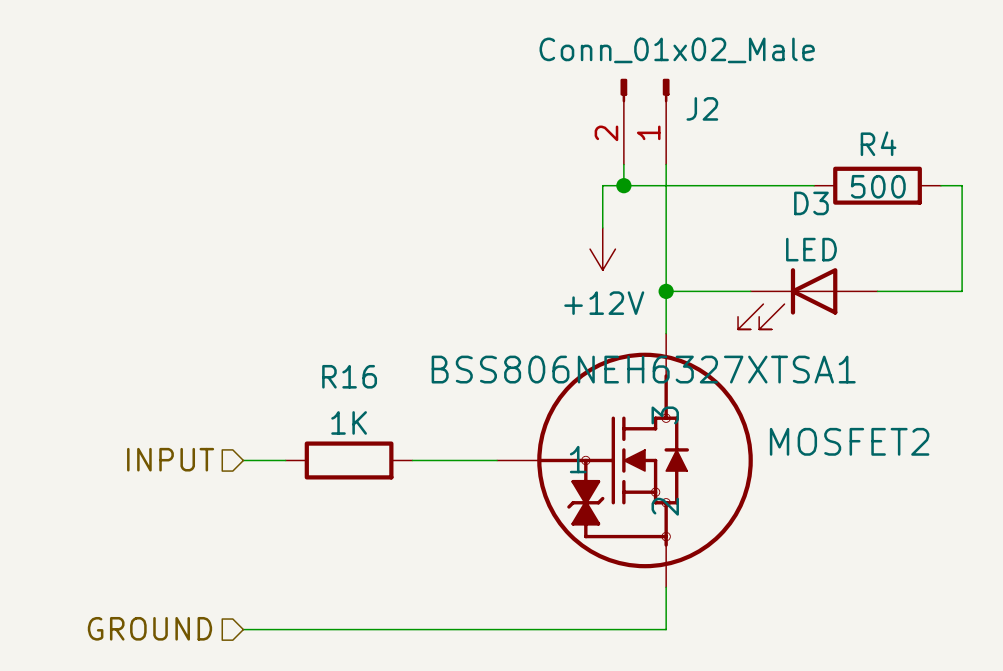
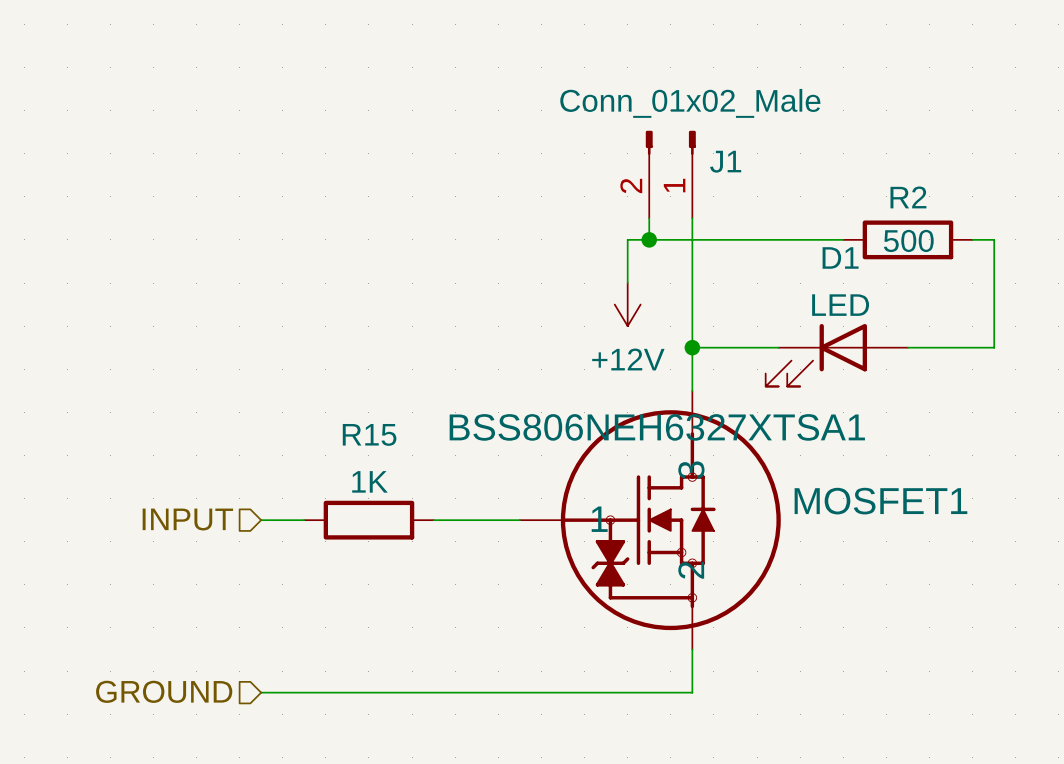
J2 name: J2 (702, 108) -> J1 (725, 161)
R4 name: R4 (878, 143) -> R2 (908, 197)
D3 name: D3 (811, 203) -> D1 (840, 257)
R16 name: R16 (349, 376) -> R15 (369, 434)
MOSFET2 name: MOSFET2 (849, 441) -> MOSFET1 (880, 501)

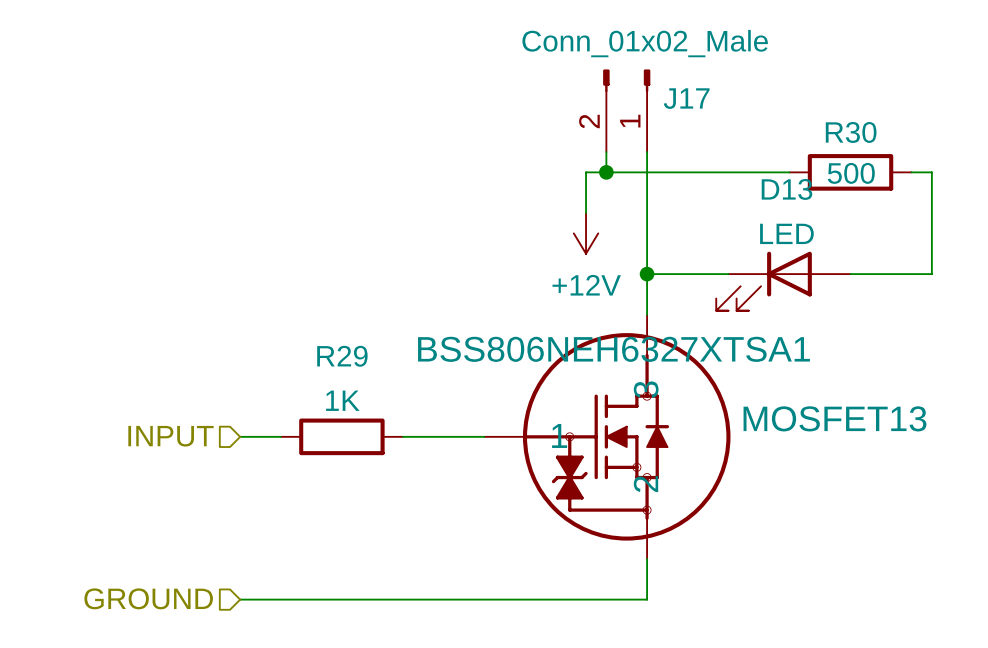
J1 name: J1 (725, 161) -> J17 (686, 98)
R2 name: R2 (908, 197) -> R30 (851, 132)
D1 name: D1 (840, 257) -> D13 (786, 189)
R15 name: R15 (369, 434) -> R29 (342, 356)
MOSFET1 name: MOSFET1 (880, 501) -> MOSFET13 (834, 418)

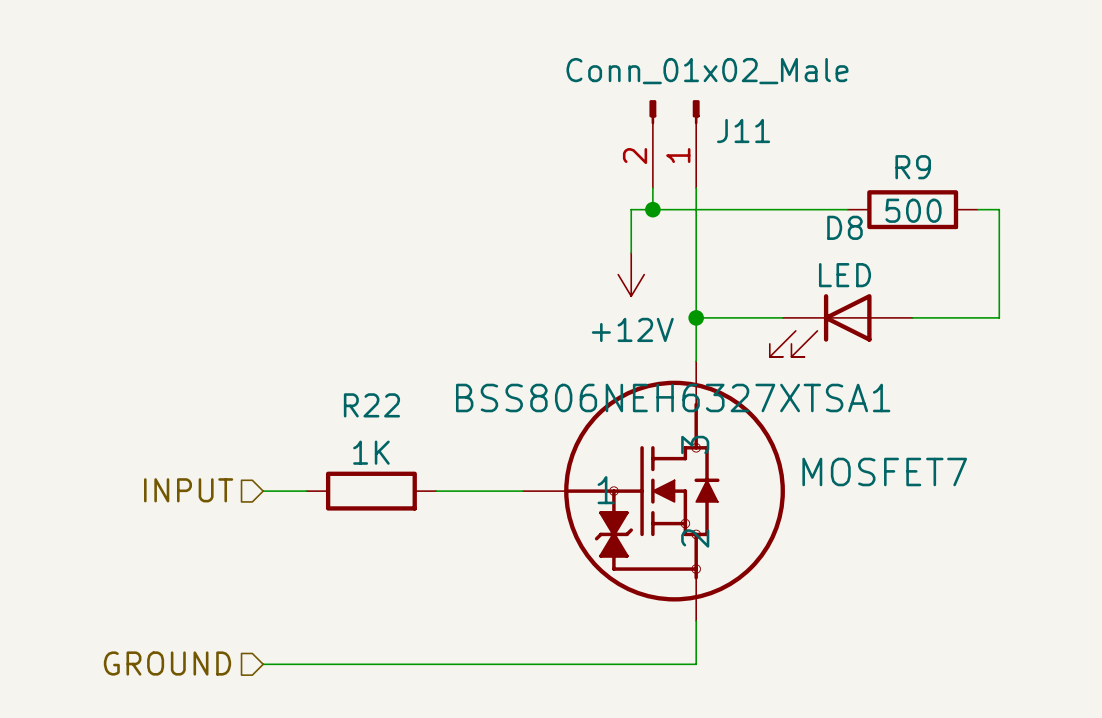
J17 name: J17 (686, 98) -> J11 (743, 131)
R30 name: R30 (851, 132) -> R9 (913, 167)
D13 name: D13 (786, 189) -> D8 (845, 227)
R29 name: R29 (342, 356) -> R22 (371, 405)
MOSFET13 name: MOSFET13 (834, 418) -> MOSFET7 (884, 471)

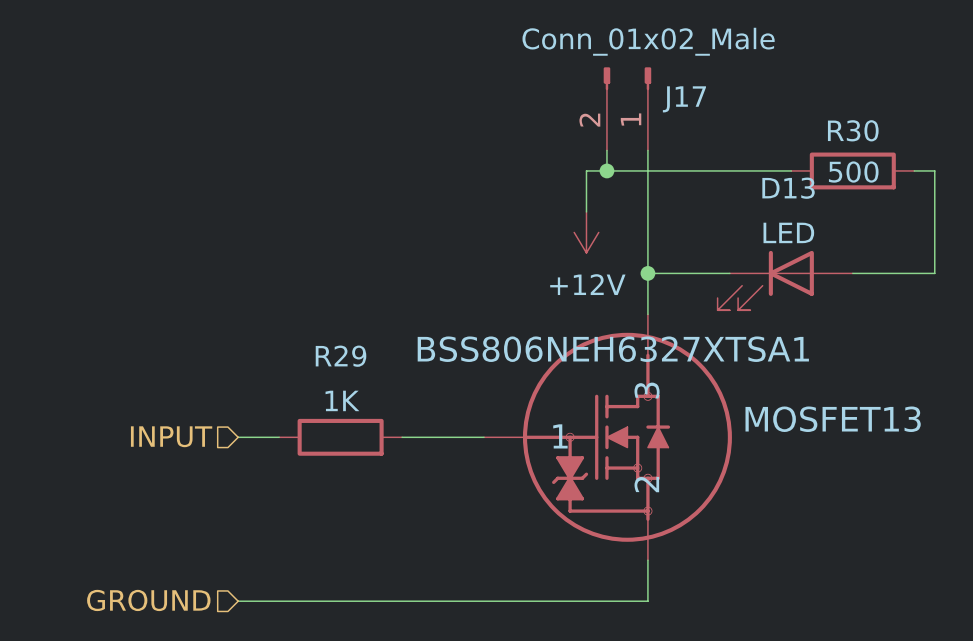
J11 name: J11 (743, 131) -> J17 (684, 99)
R9 name: R9 (913, 167) -> R30 (853, 130)
D8 name: D8 (845, 227) -> D13 (788, 188)
R22 name: R22 (371, 405) -> R29 (341, 356)
MOSFET7 name: MOSFET7 (884, 471) -> MOSFET13 (833, 419)

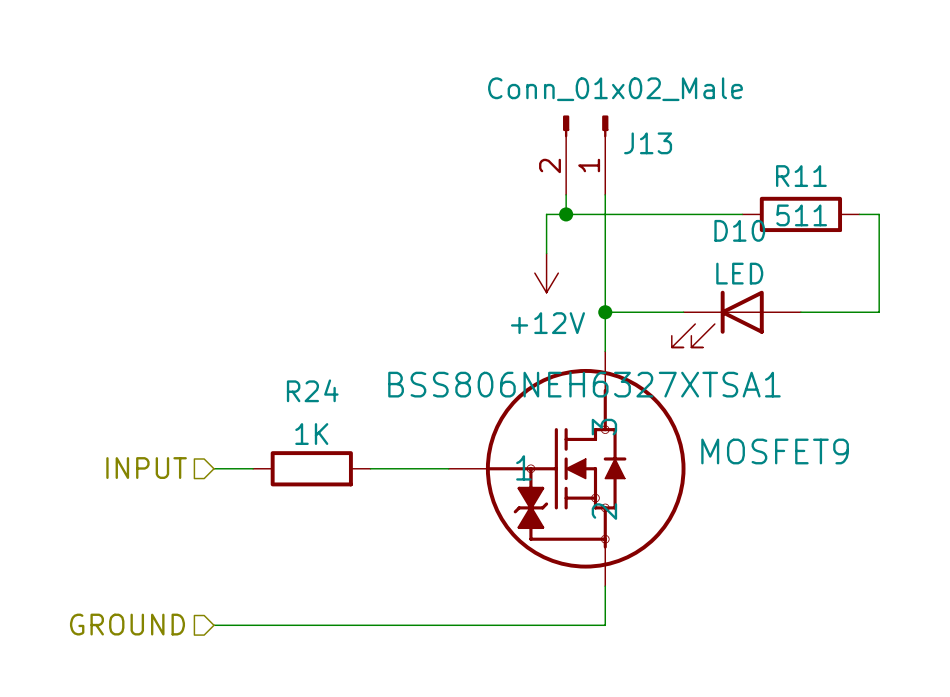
J17 name: J17 (684, 99) -> J13 (648, 143)
R30 name: R30 (853, 130) -> R11 (801, 176)
R30 value: 500 (853, 172) -> 511 (801, 215)
D13 name: D13 (788, 188) -> D10 (739, 230)
R29 name: R29 (341, 356) -> R24 (312, 390)
MOSFET13 name: MOSFET13 (833, 419) -> MOSFET9 (775, 451)

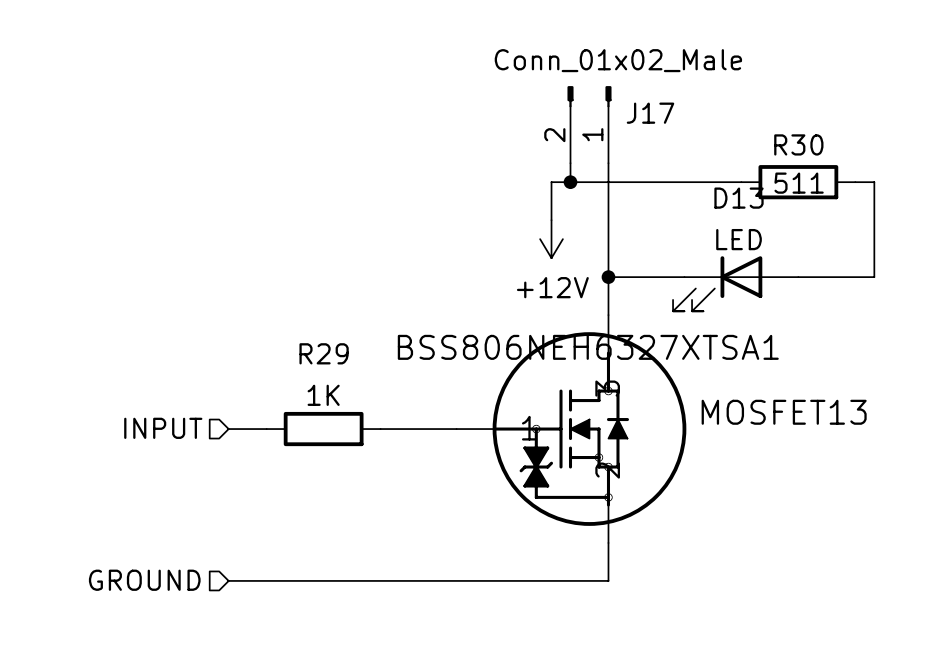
J13 name: J13 (648, 143) -> J17 (650, 113)
R11 name: R11 (801, 176) -> R30 (798, 144)
D10 name: D10 (739, 230) -> D13 (739, 198)
R24 name: R24 (312, 390) -> R29 (324, 353)
MOSFET9 name: MOSFET9 (775, 451) -> MOSFET13 (784, 412)

